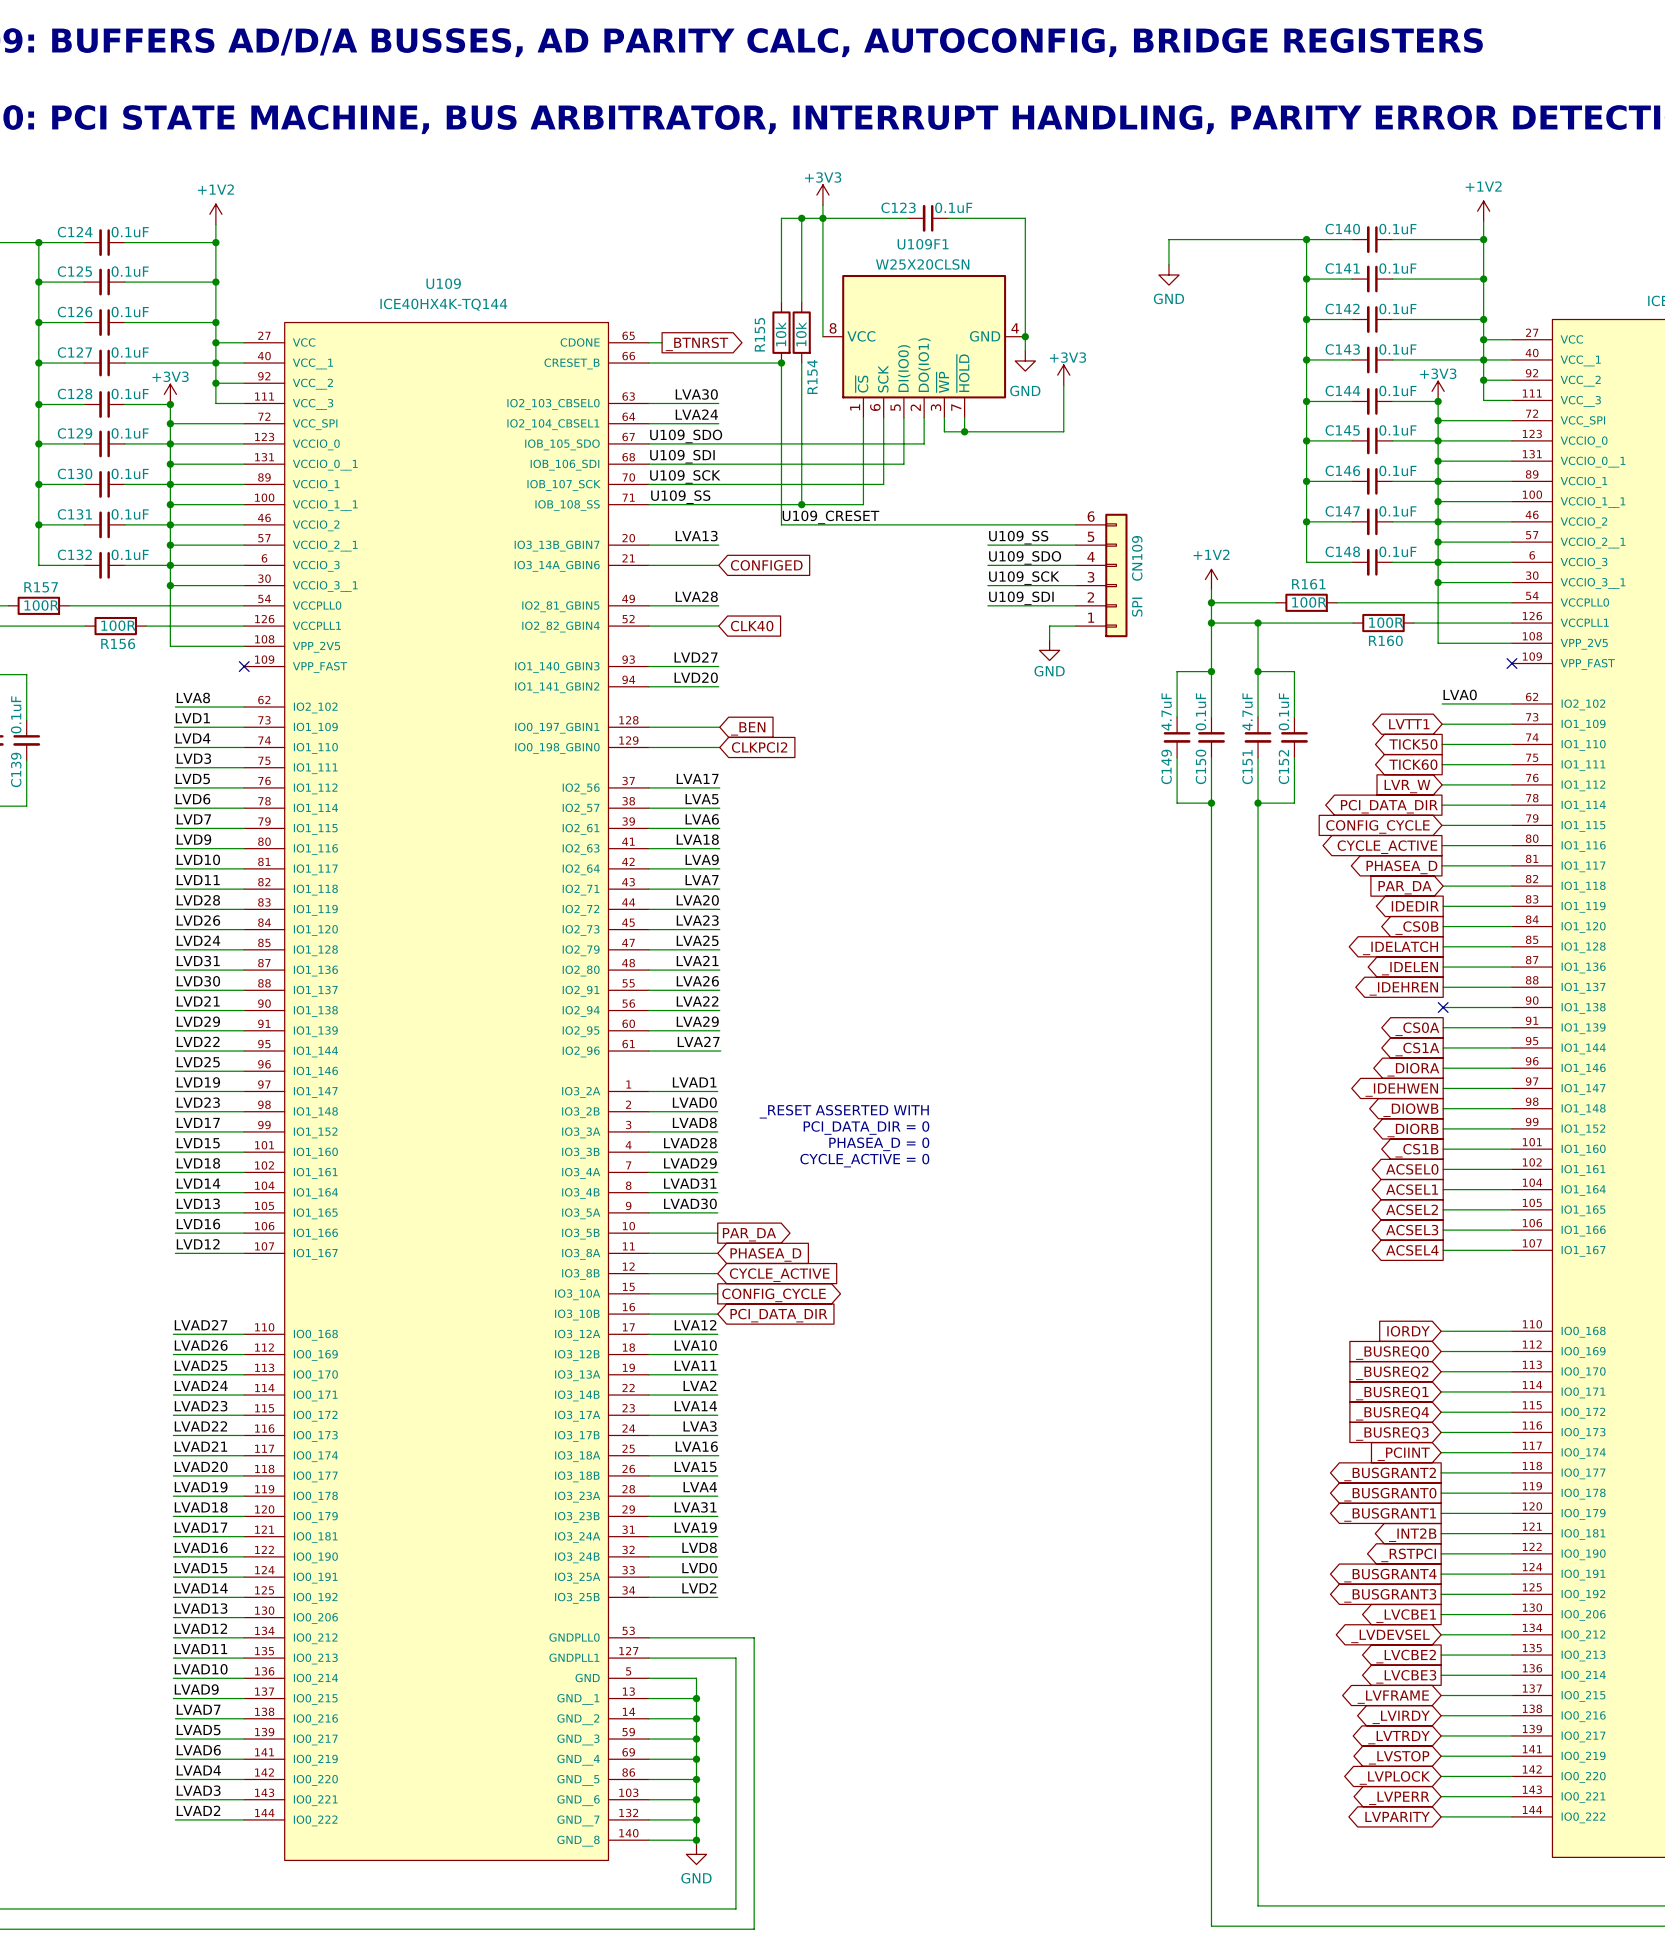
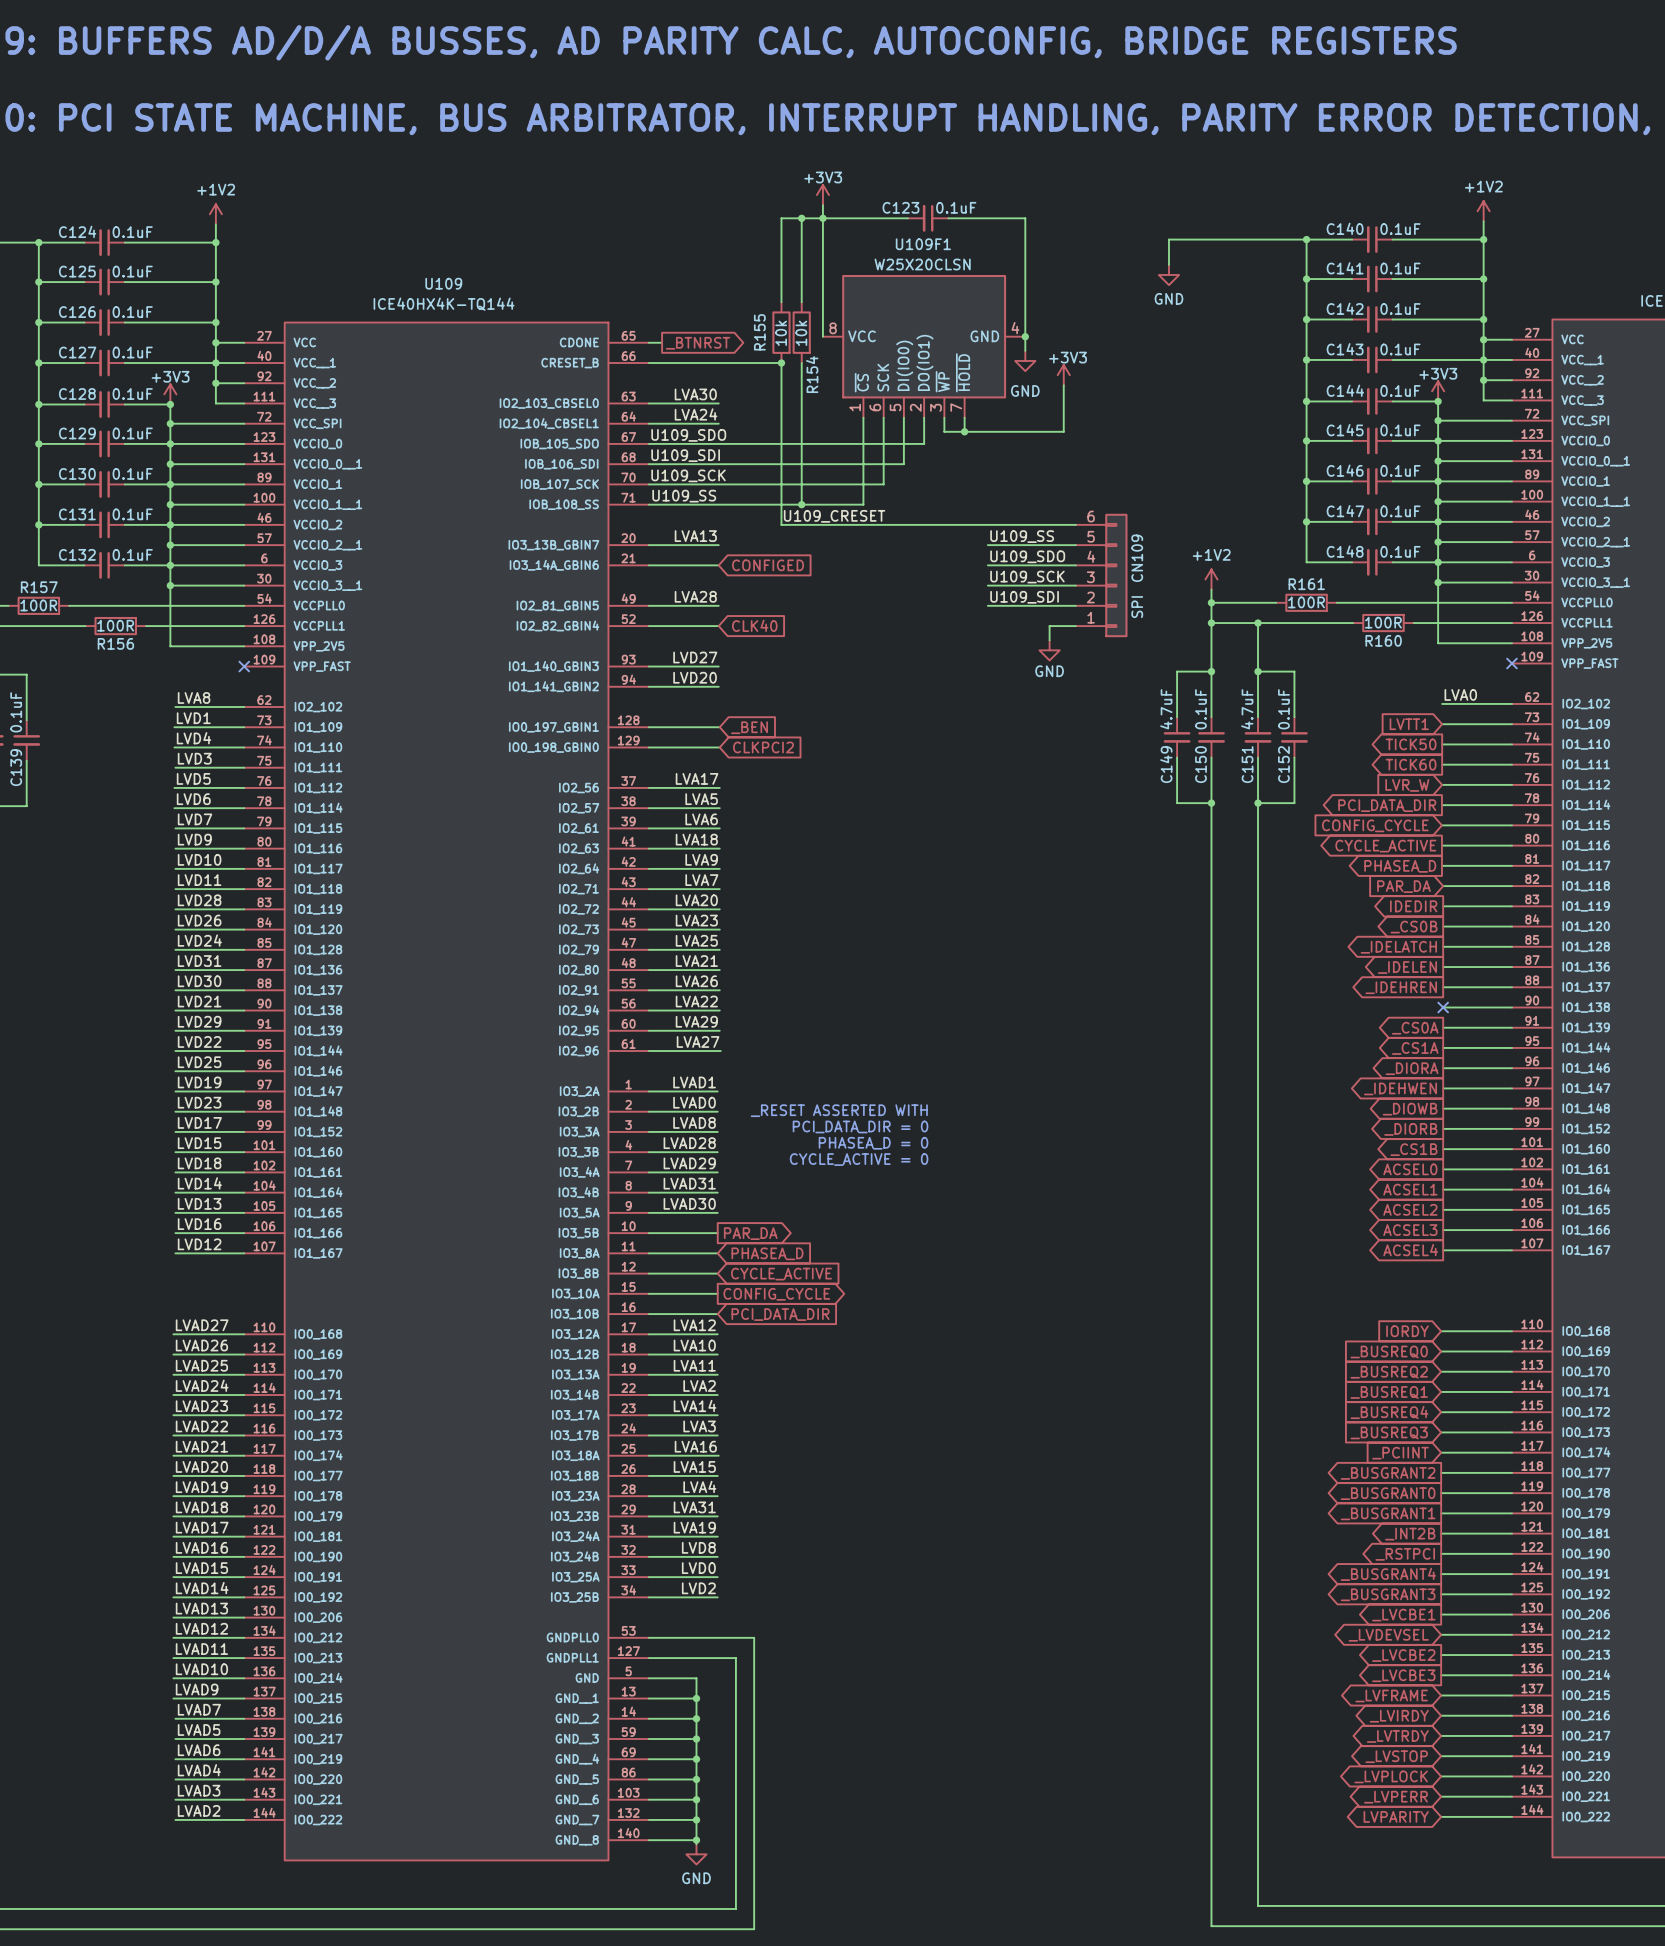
global label shape: bidirectional (1409, 724) -> input (1409, 724)

